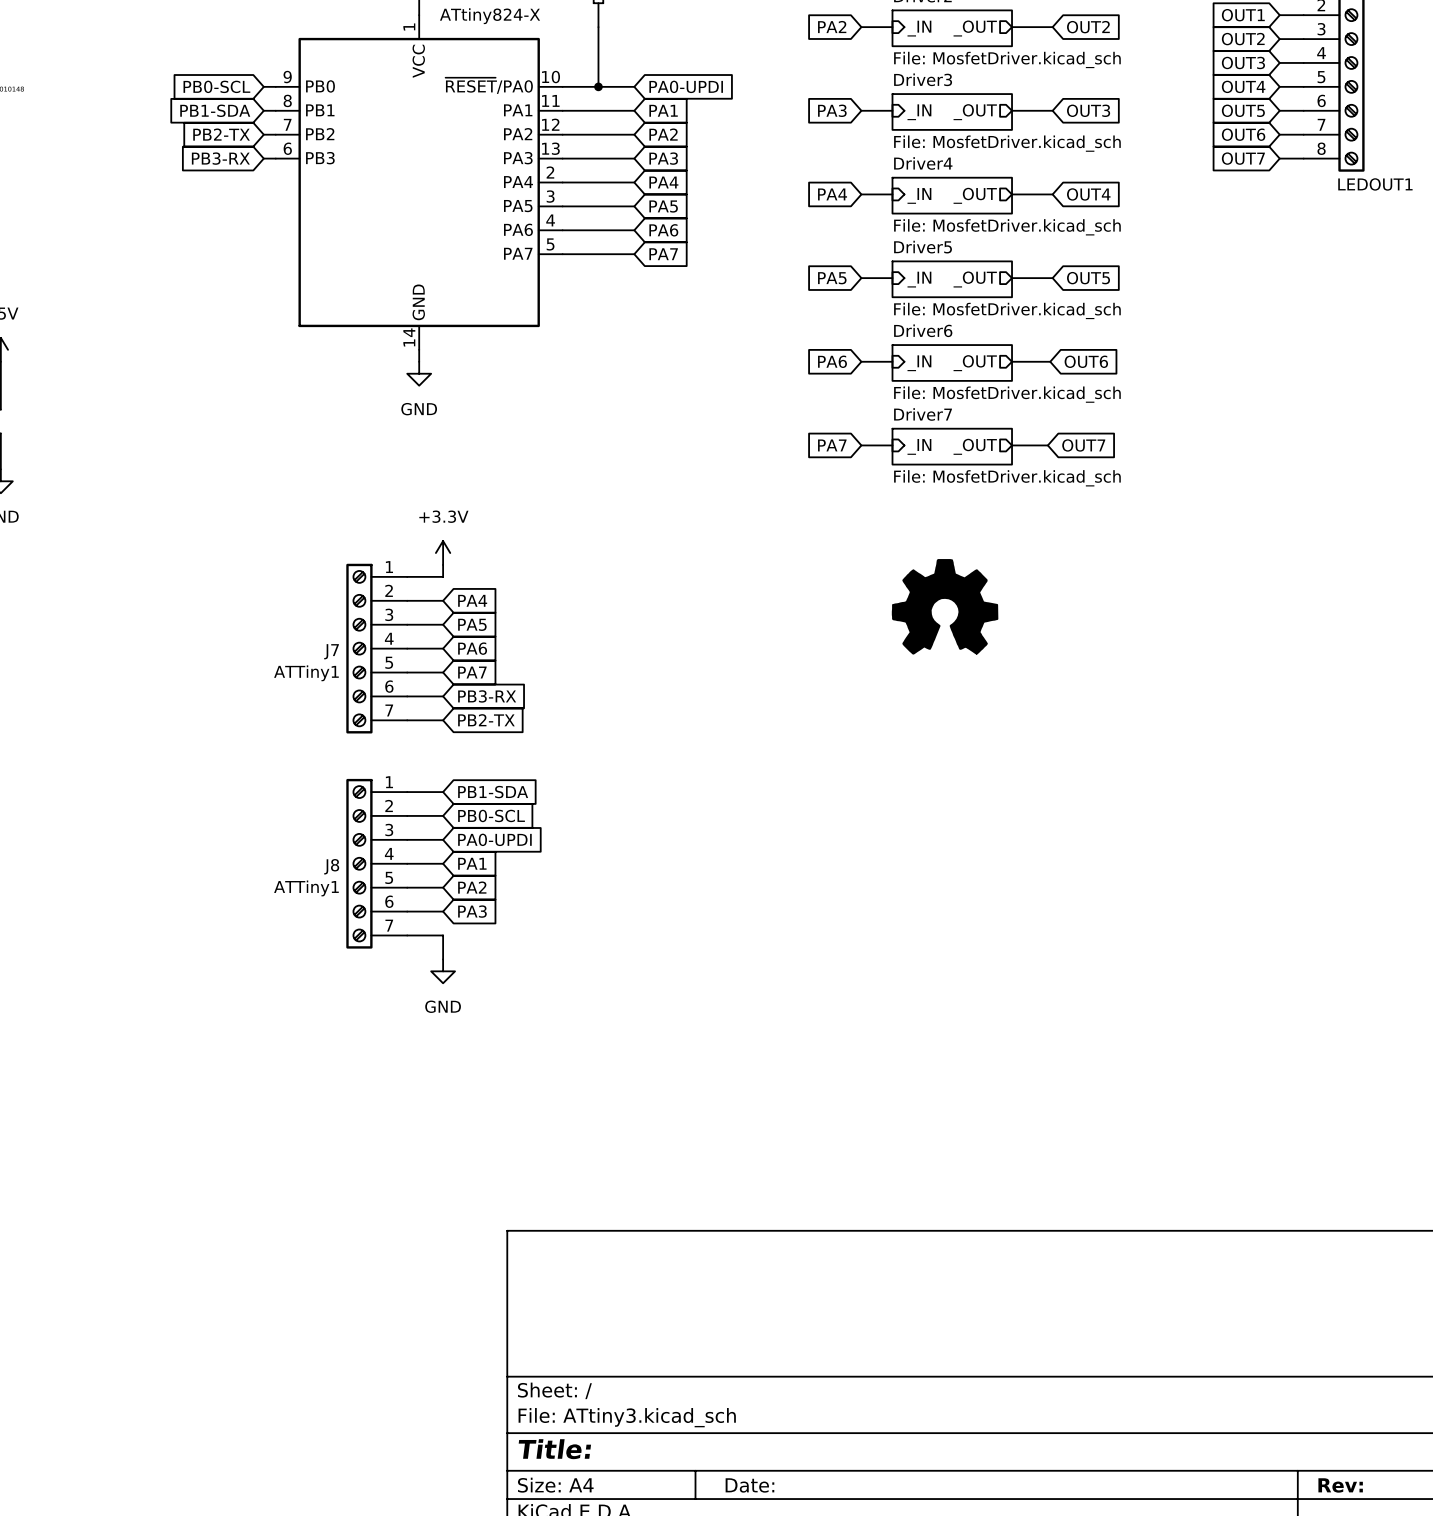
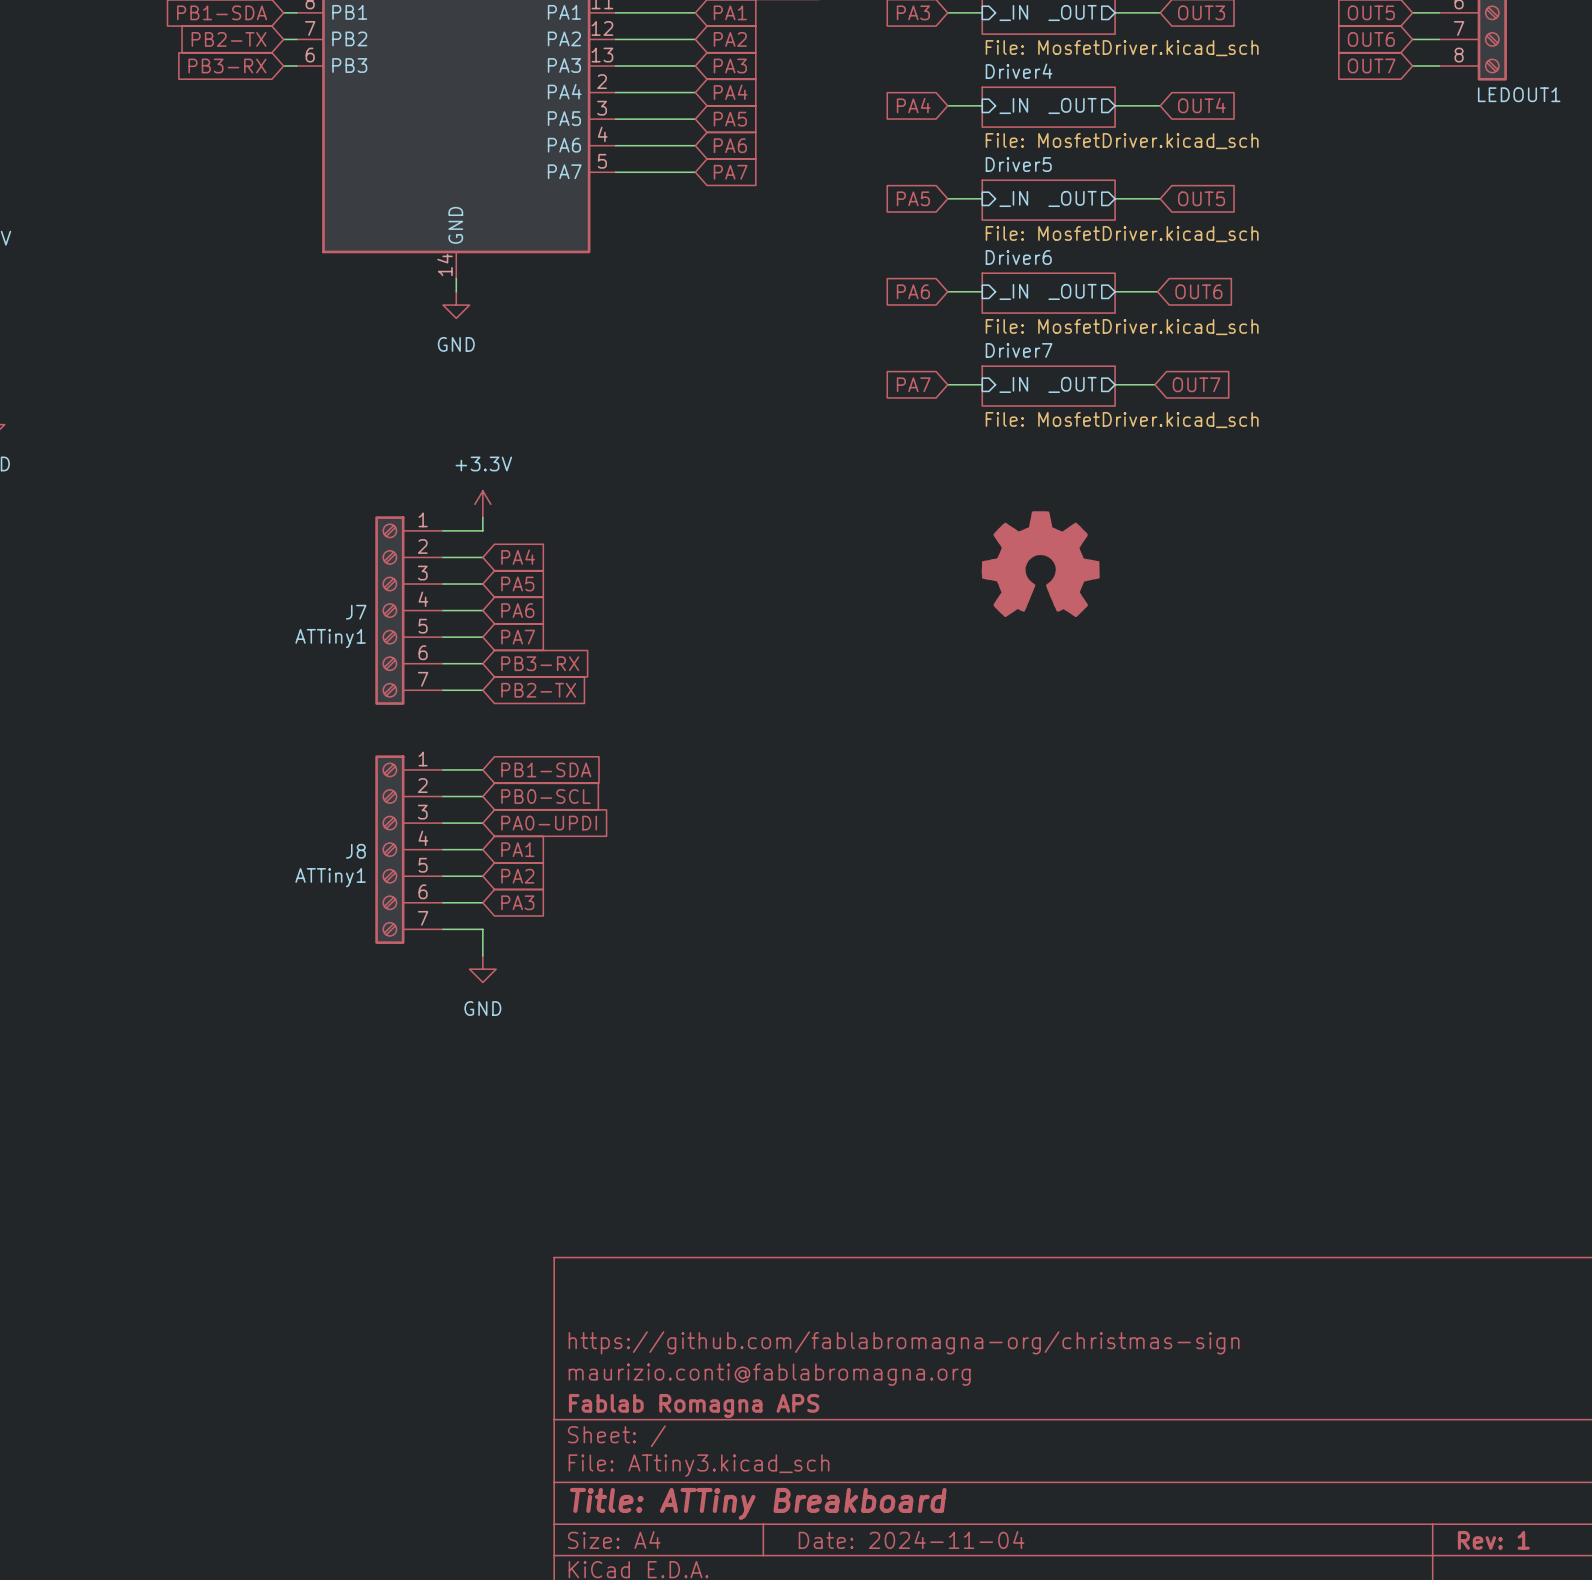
title block: none -> https://github.com/fablabromagna-org/christmas-sign (904, 1342)
title block: none -> maurizio.conti@fablabromagna.org (769, 1374)
title block: none -> Fablab Romagna APS (694, 1405)
title block: Title: (554, 1449) -> Title: ATTiny Breakboard (758, 1503)
title block: Date: (749, 1485) -> Date: 2024-11-04 (911, 1540)
title block: Rev: (1340, 1485) -> Rev: 1 (1493, 1540)

